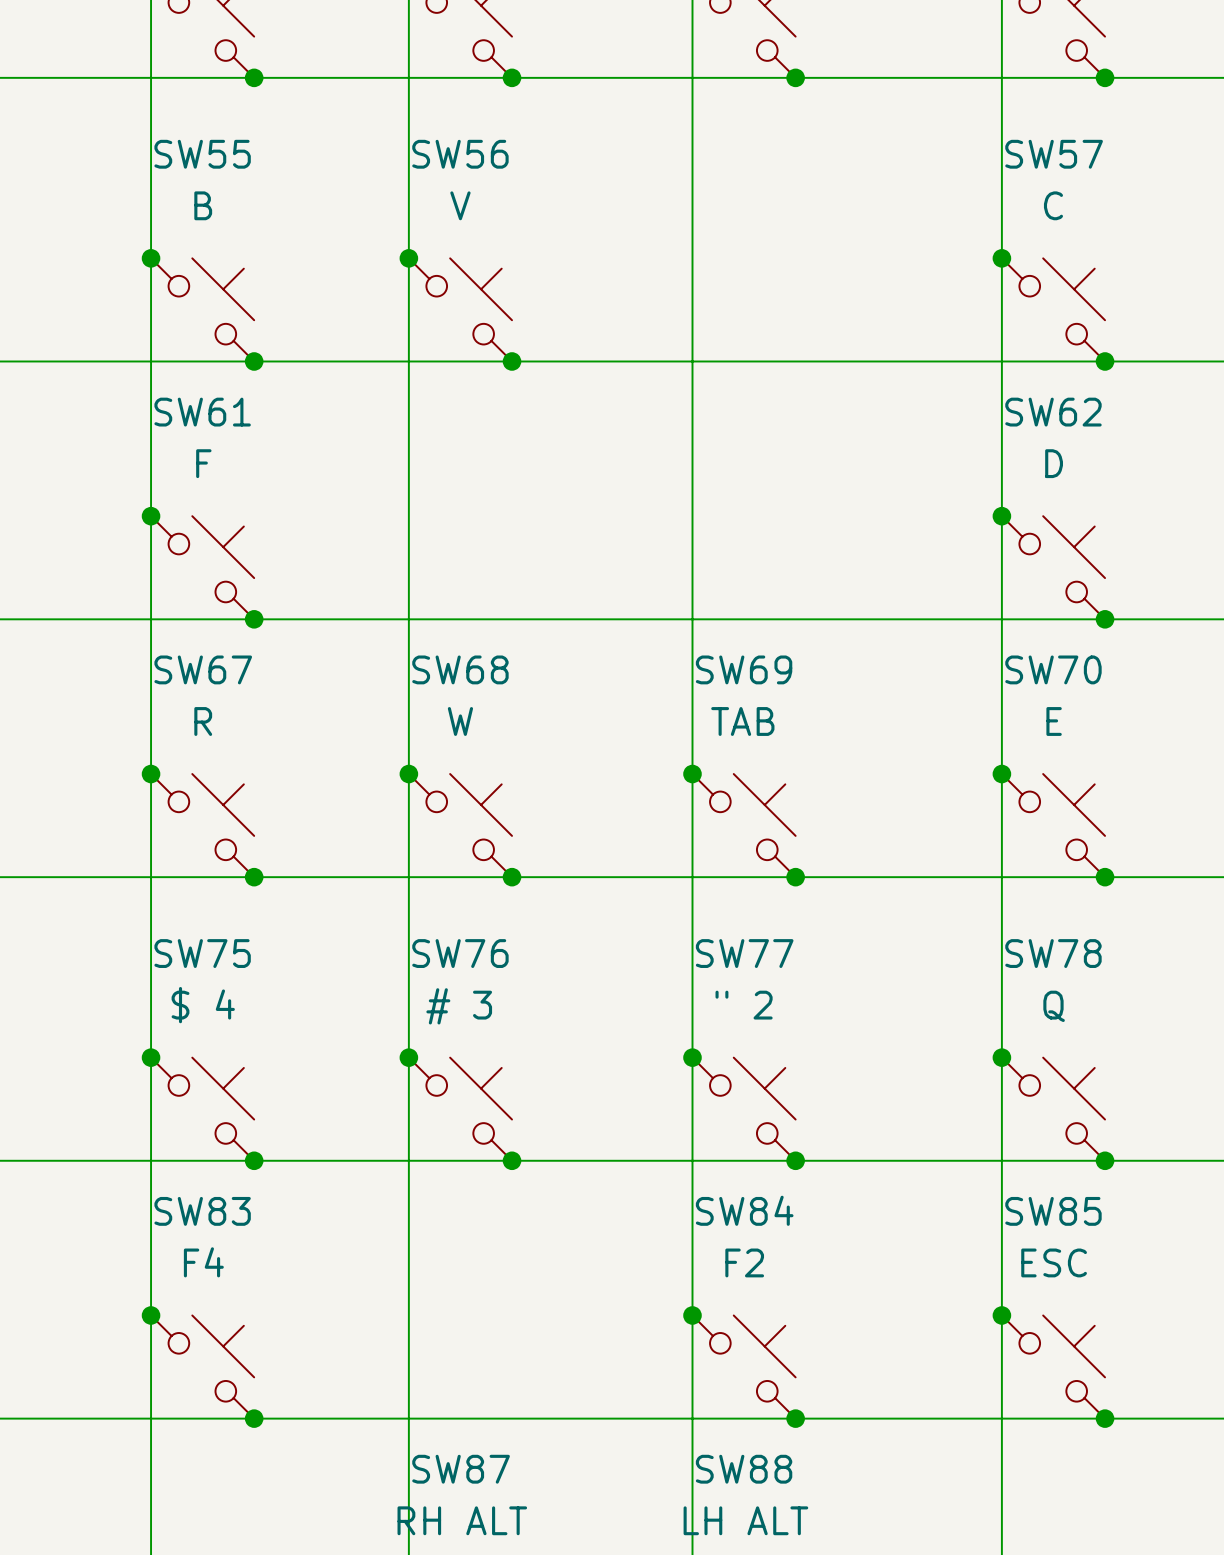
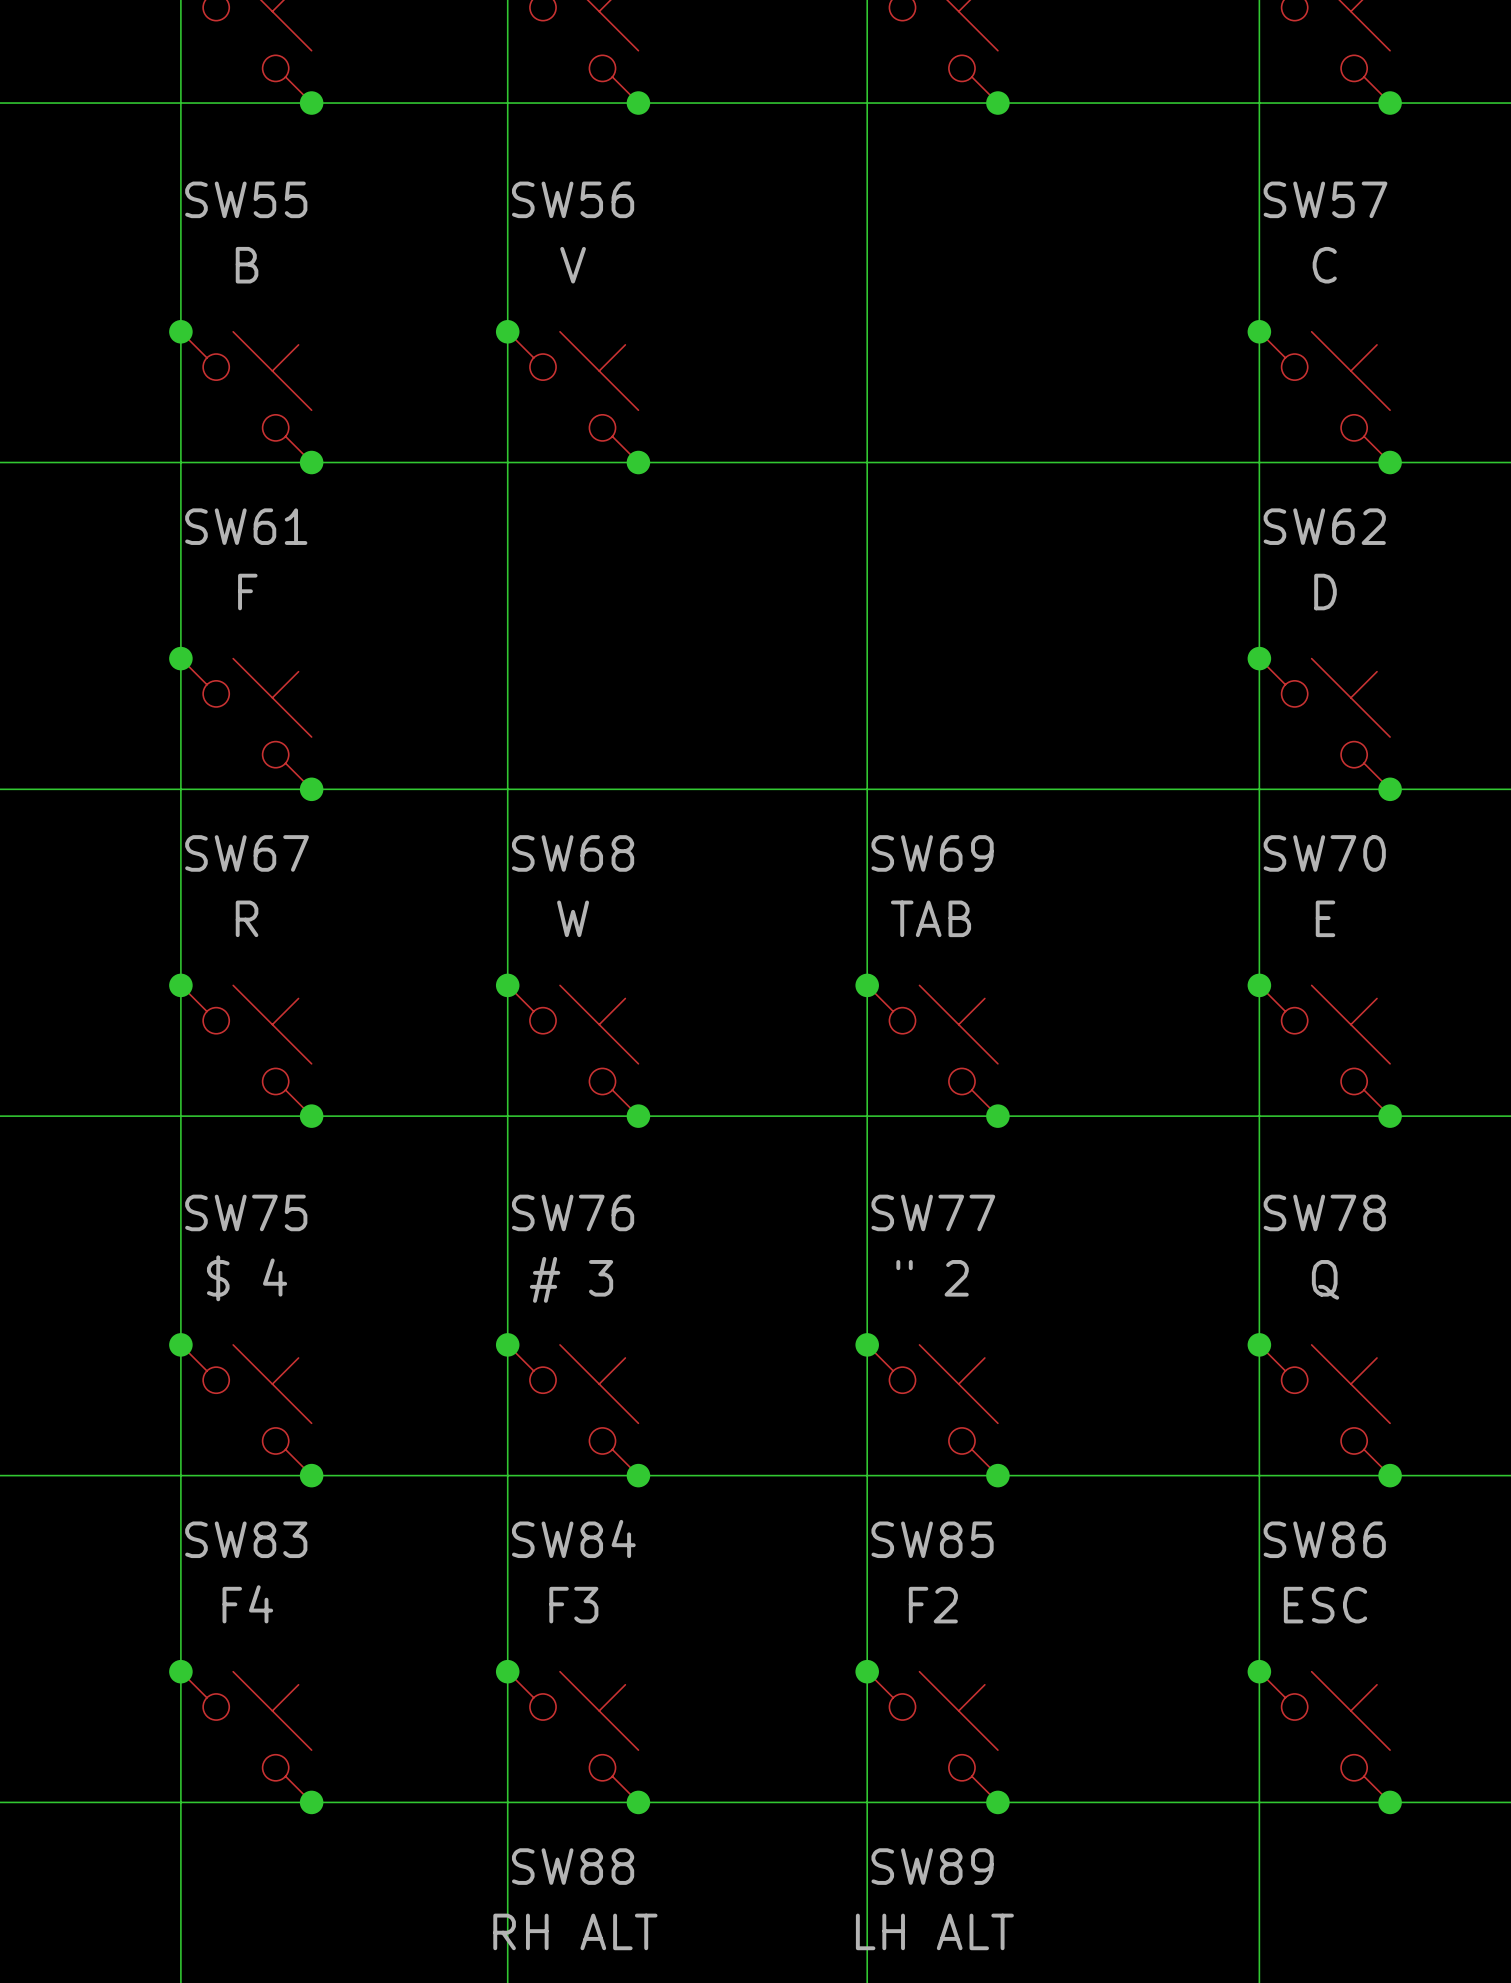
SW84 name: SW84 (744, 1210) -> SW85 (932, 1539)
SW85 name: SW85 (1053, 1211) -> SW86 (1324, 1539)
junction: none -> (507, 1671)
SW84: none -> F3 (573, 1737)
junction: none -> (638, 1802)
SW87 name: SW87 (461, 1469) -> SW88 (573, 1866)
SW88 name: SW88 (744, 1469) -> SW89 (932, 1866)

